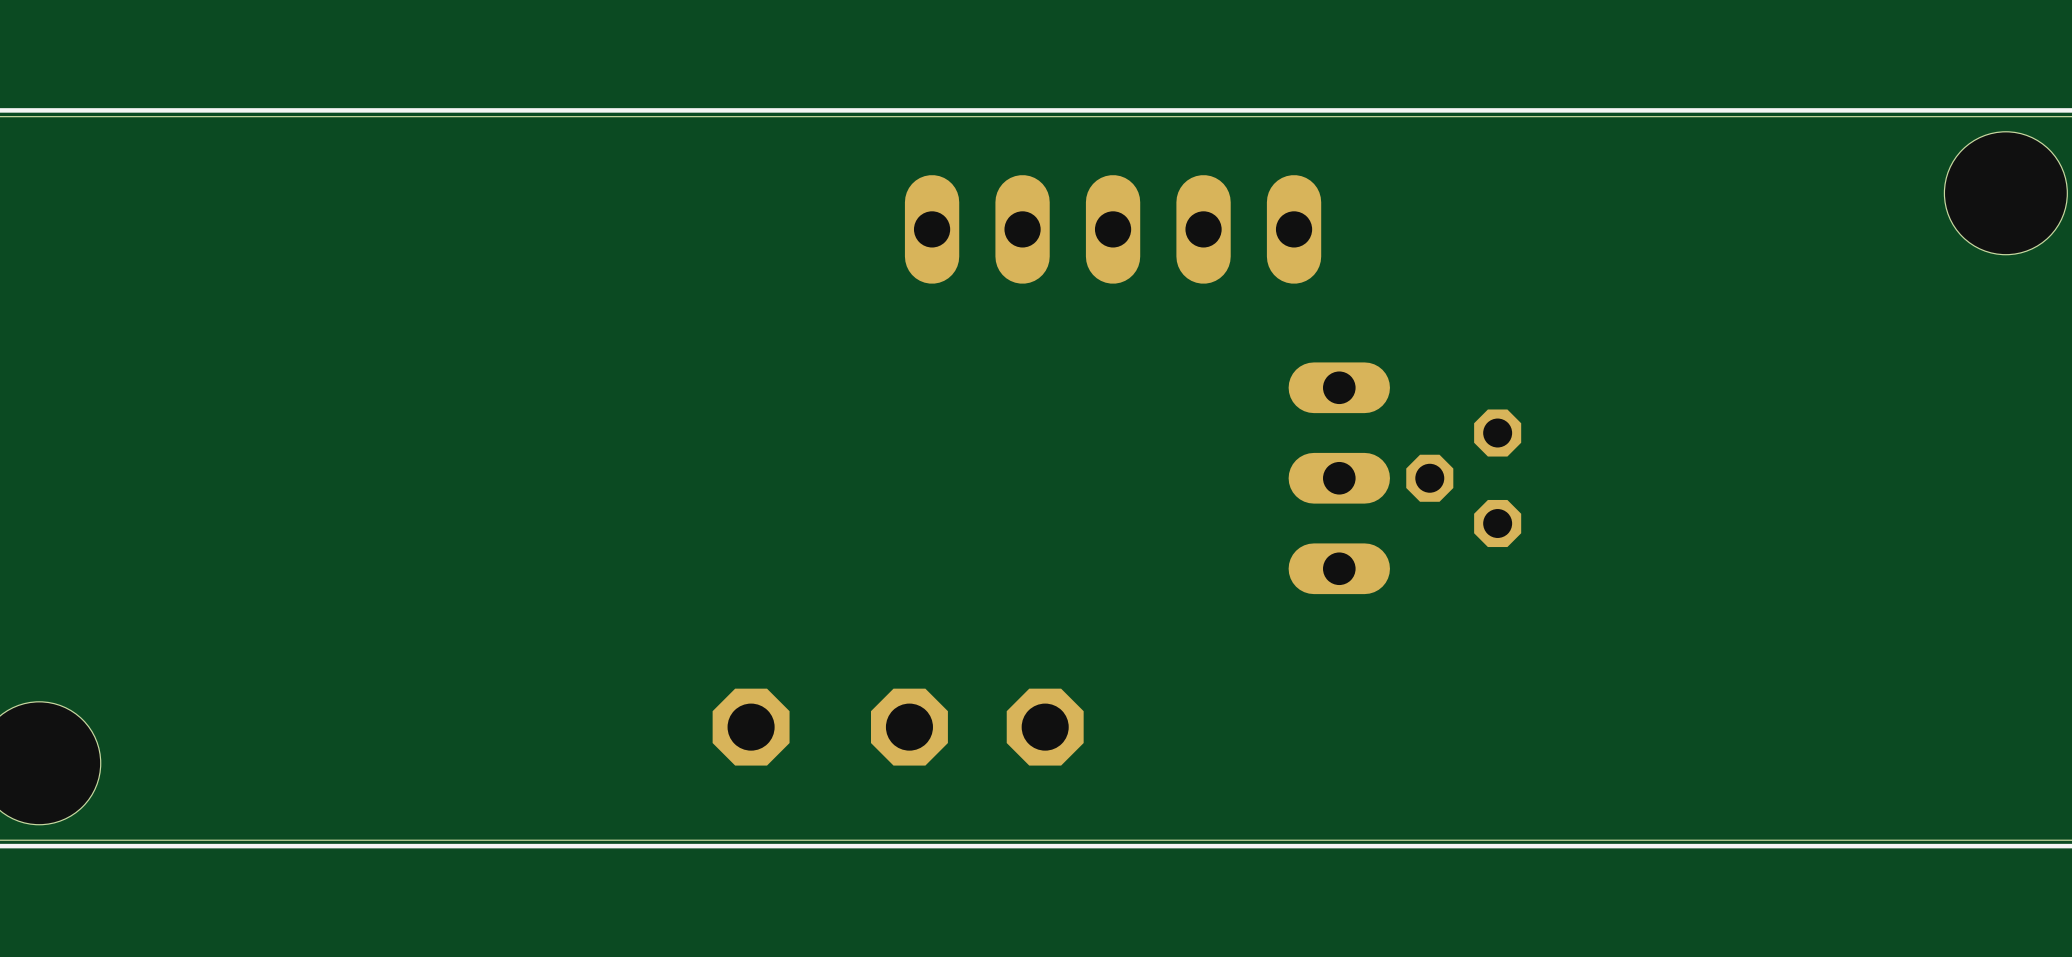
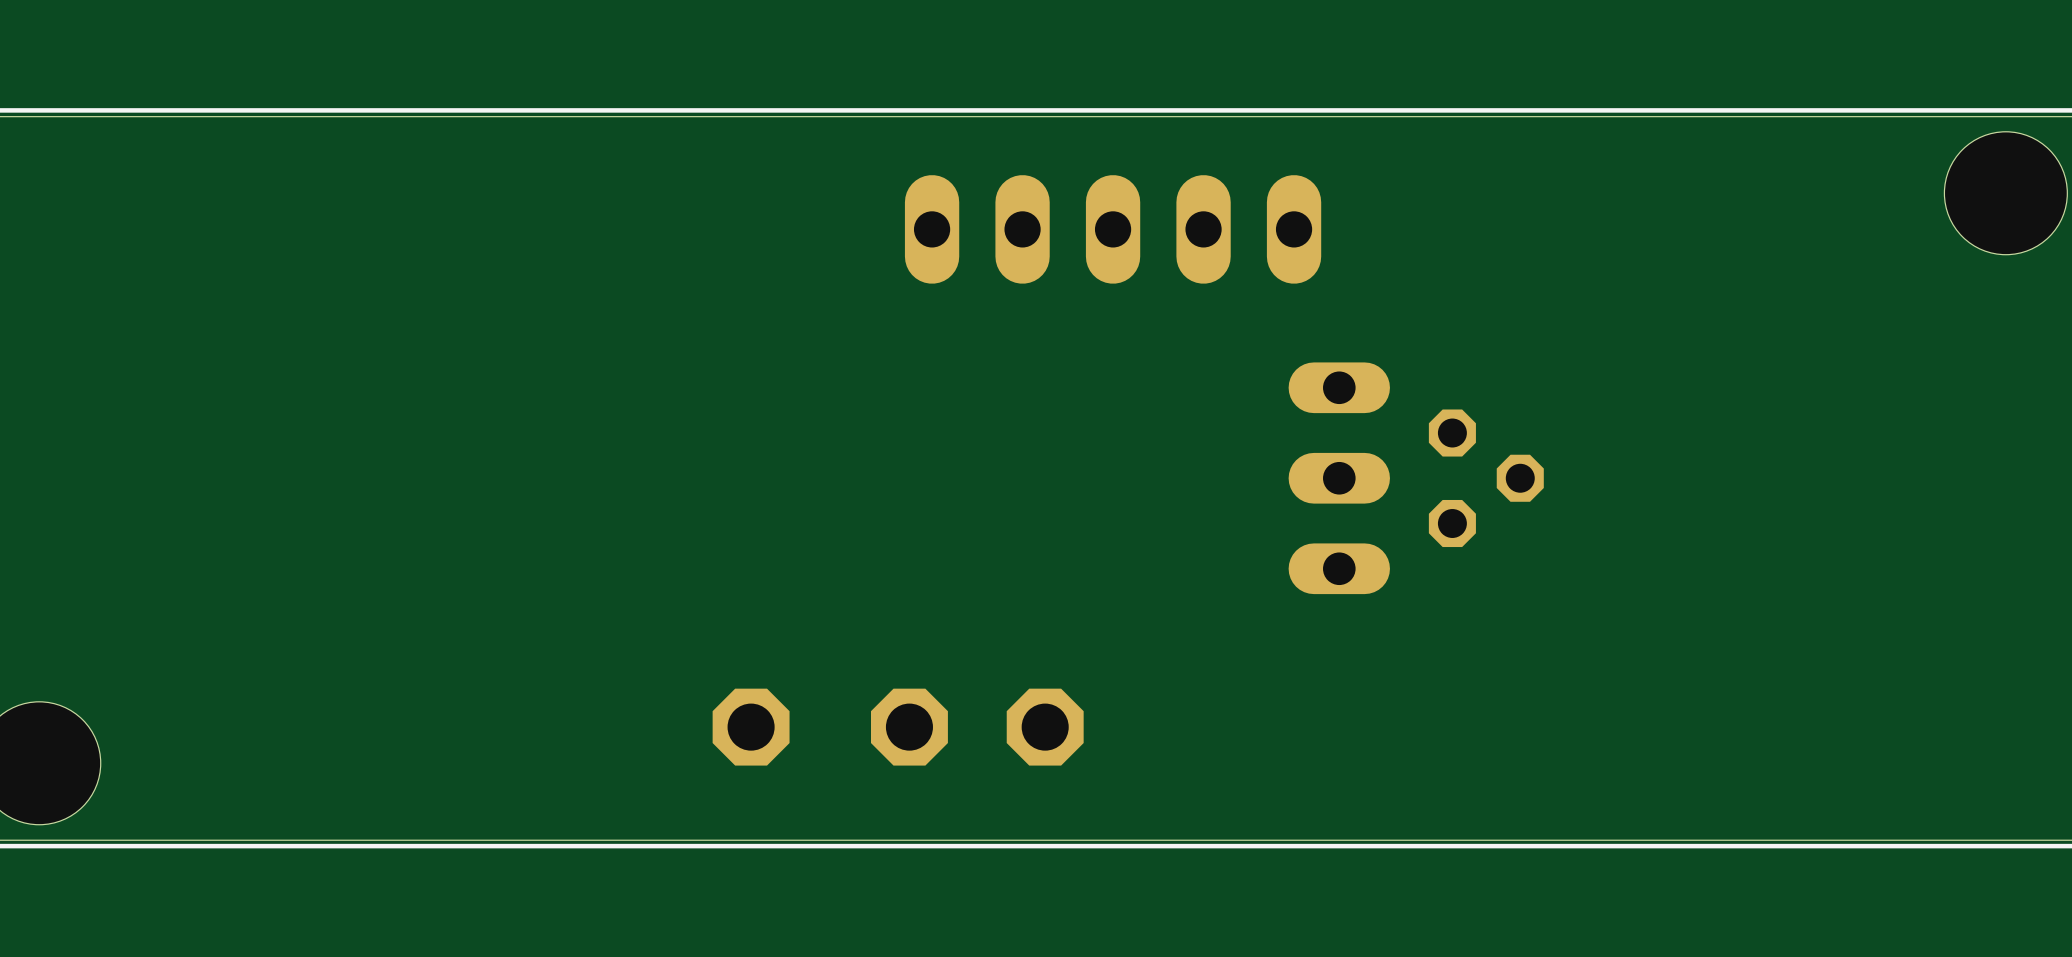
part rotation: 0° (1463, 478) -> 180° (1486, 478)

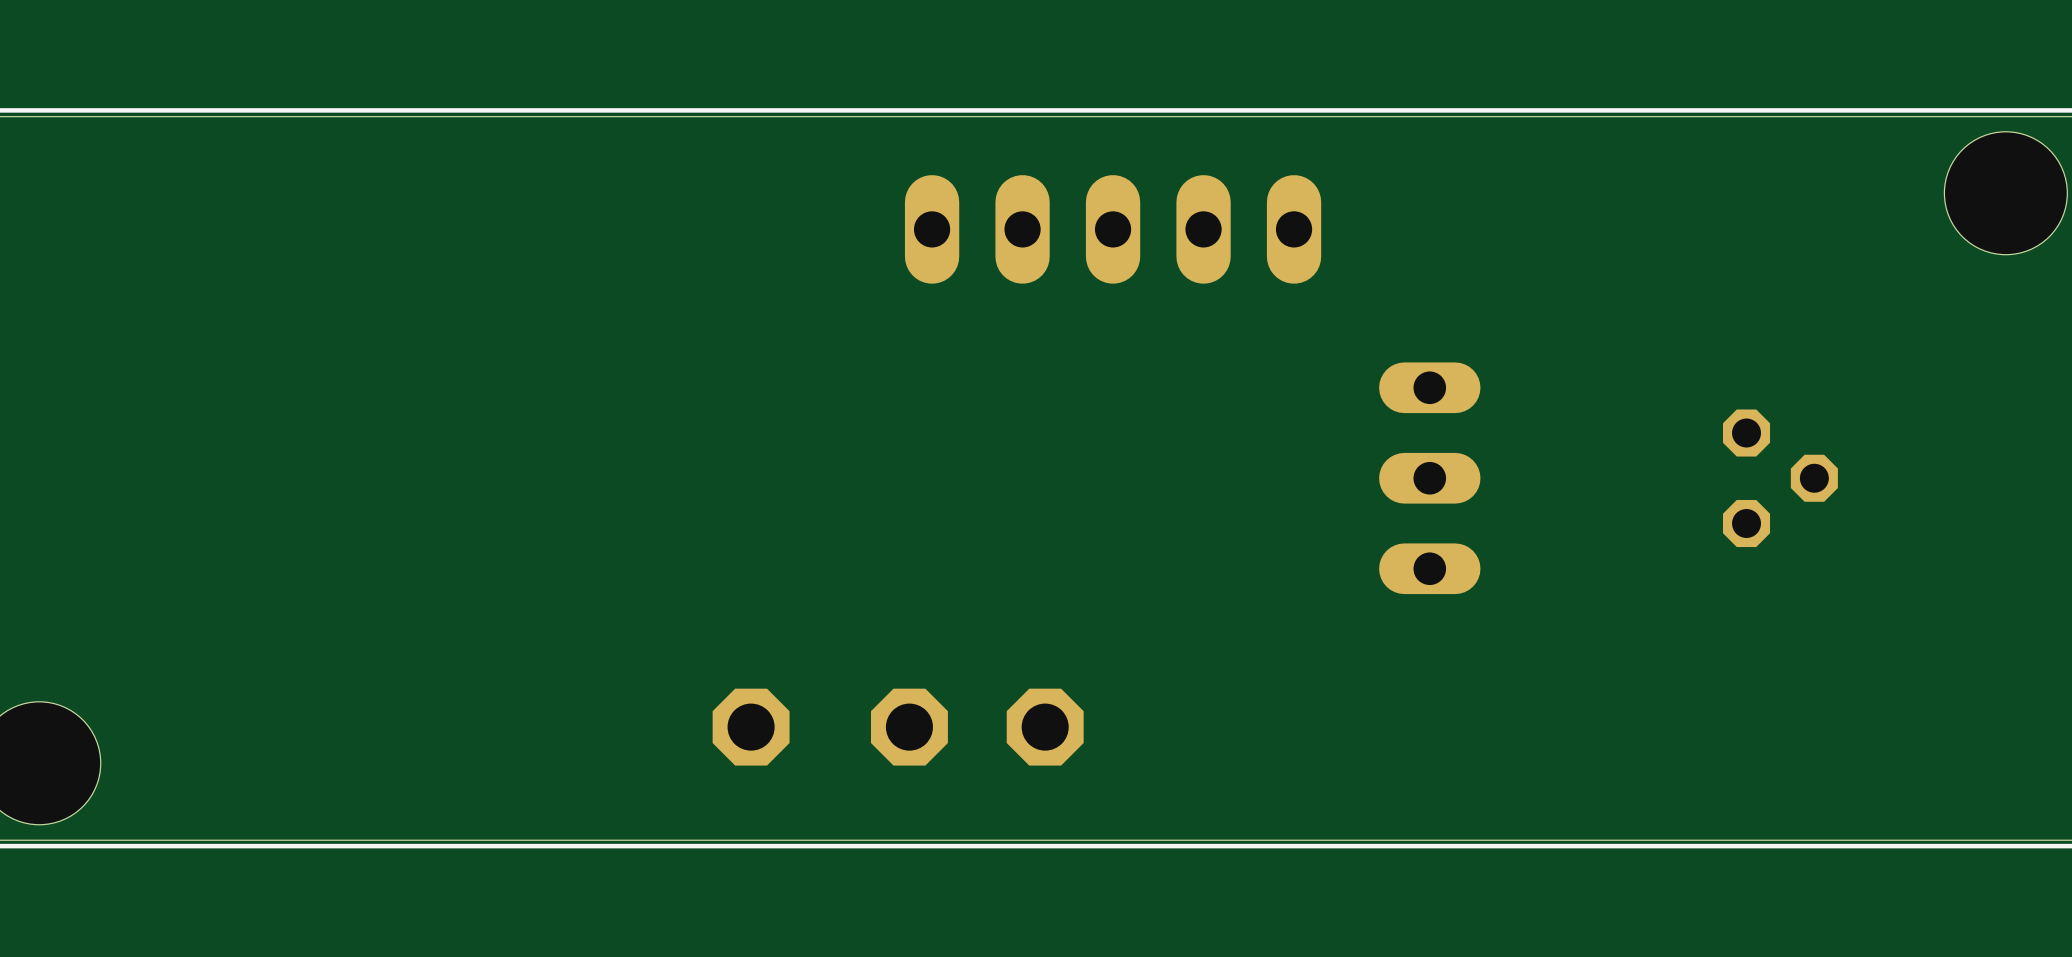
part position: (1339, 478) -> (1429, 478)
part position: (1486, 478) -> (1780, 478)

